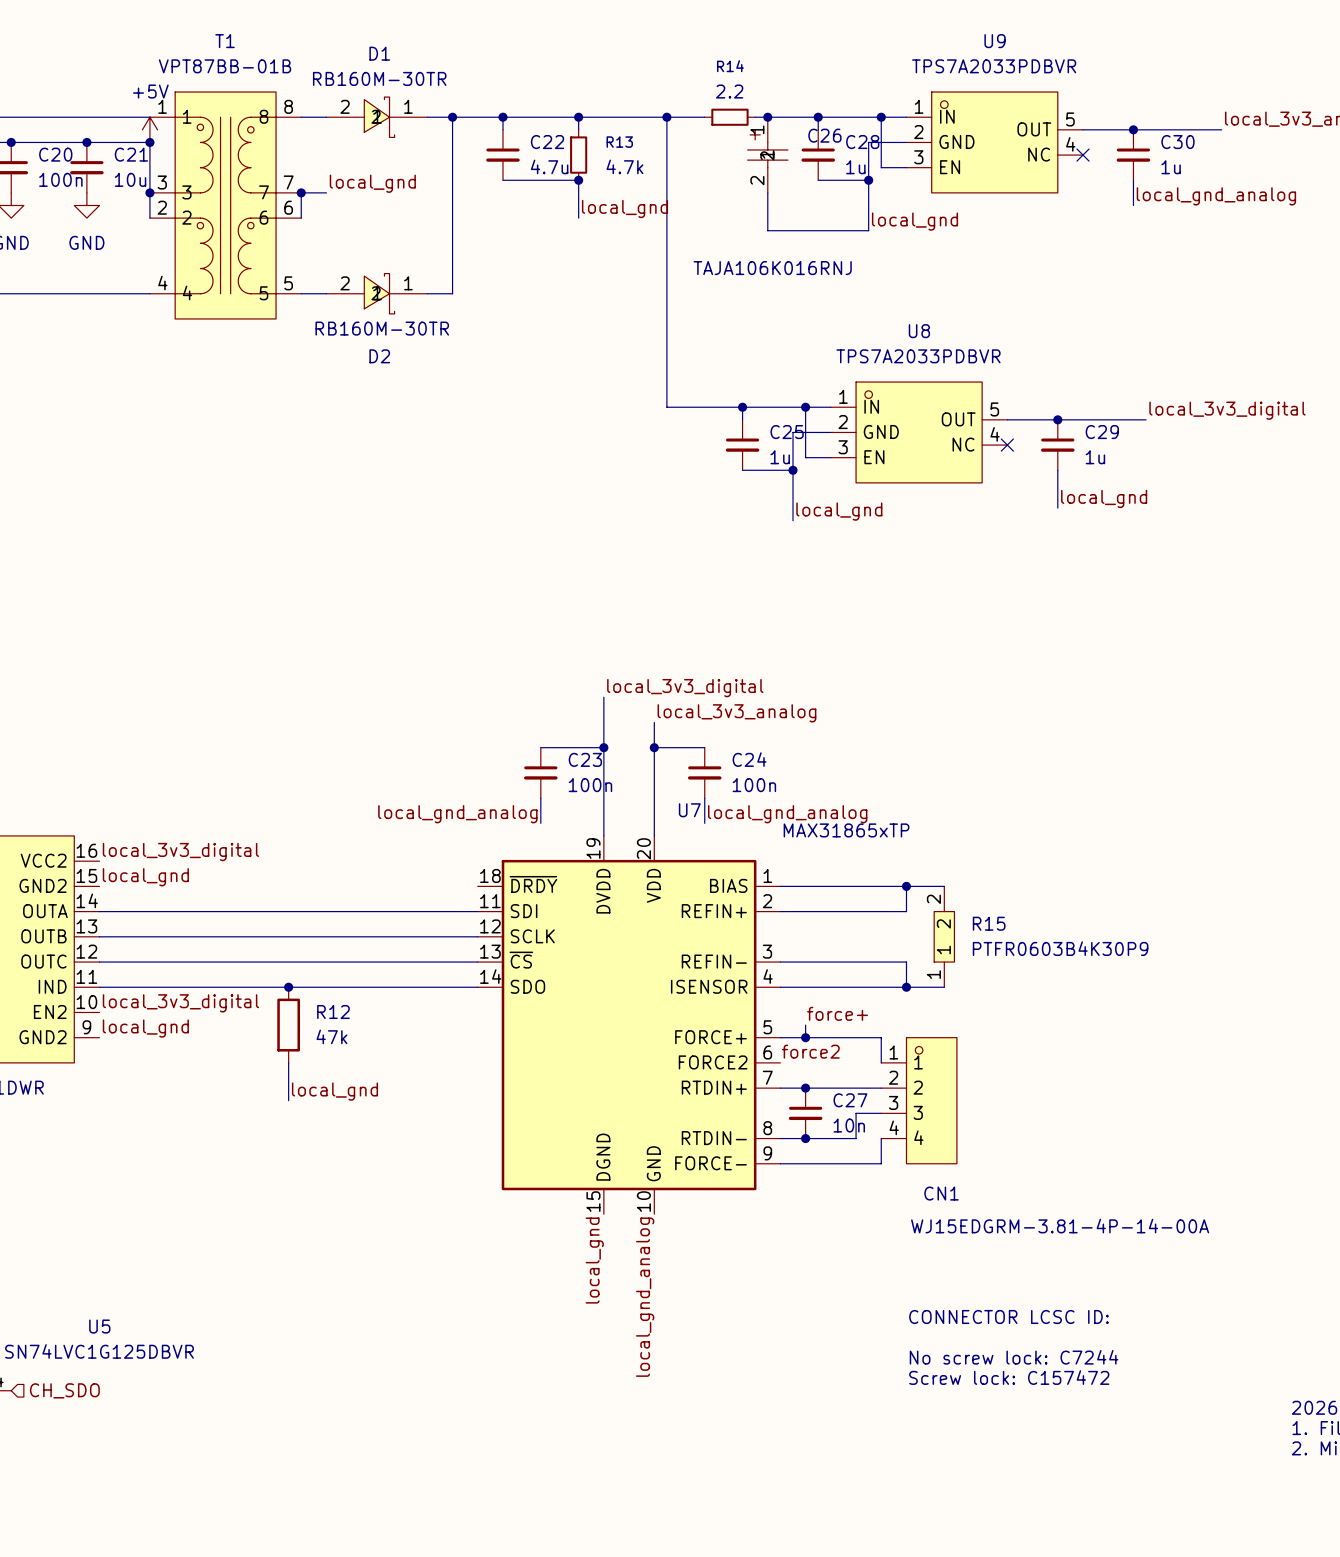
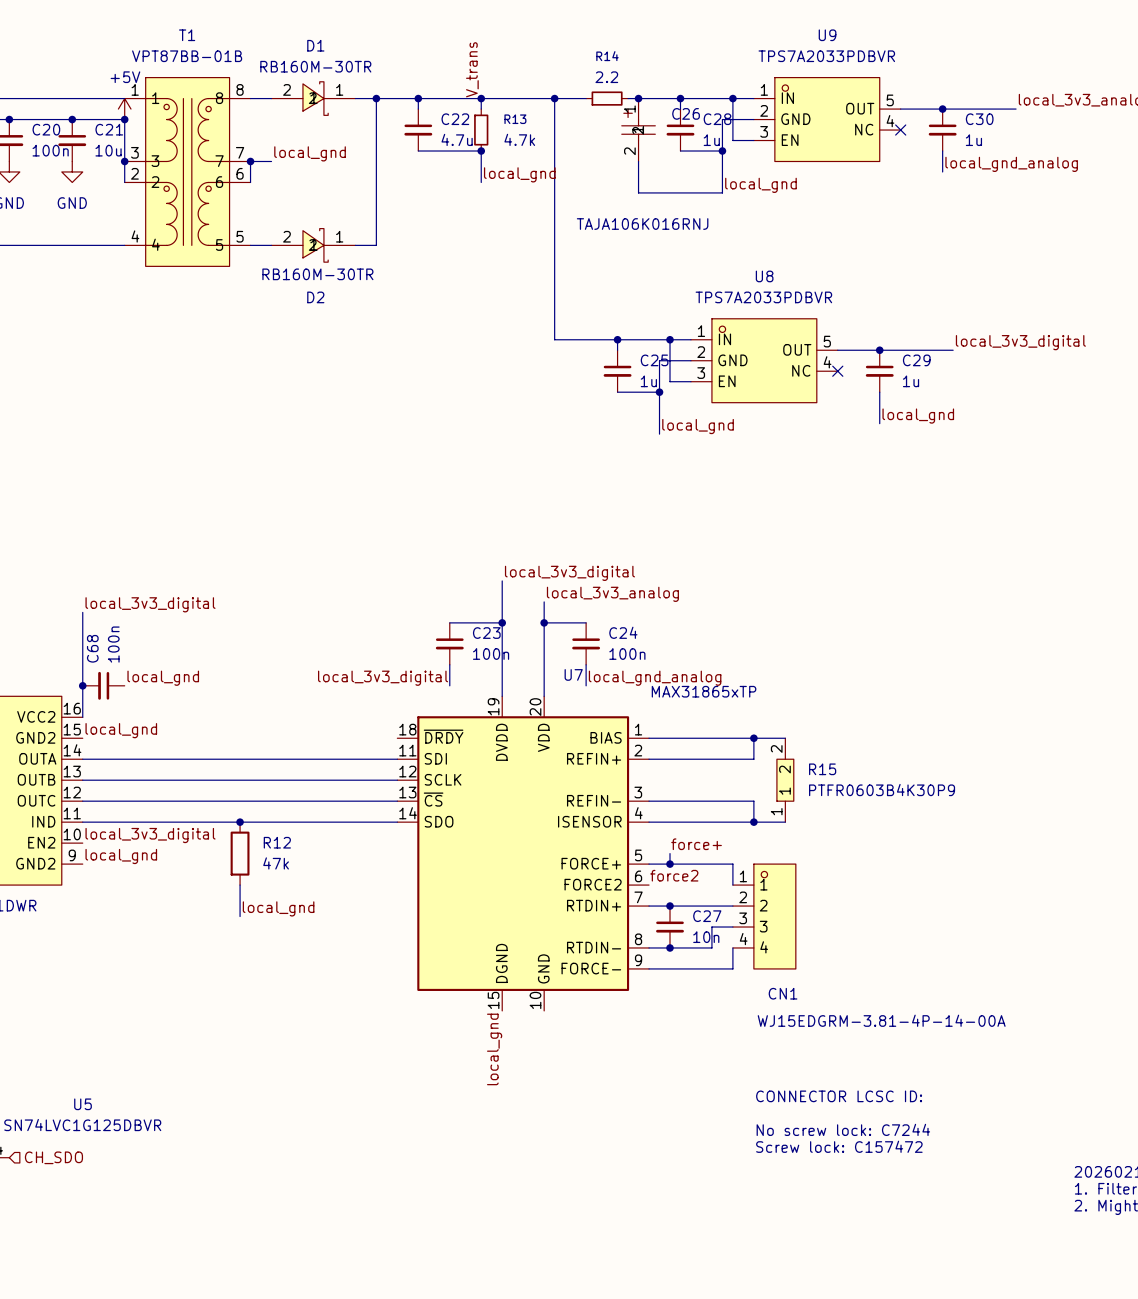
label: none -> V_trans (472, 69)
wire: none -> (82, 612) (82, 717)
label: none -> local_gnd (163, 678)
label: local_gnd_analog (457, 814) -> local_3v3_digital (383, 678)
junction: none -> (82, 685)
C68: none -> 100n (103, 685)
label position: local_3v3_digital (180, 852) -> local_3v3_digital (150, 604)
label: local_gnd_analog (645, 1297) -> none

